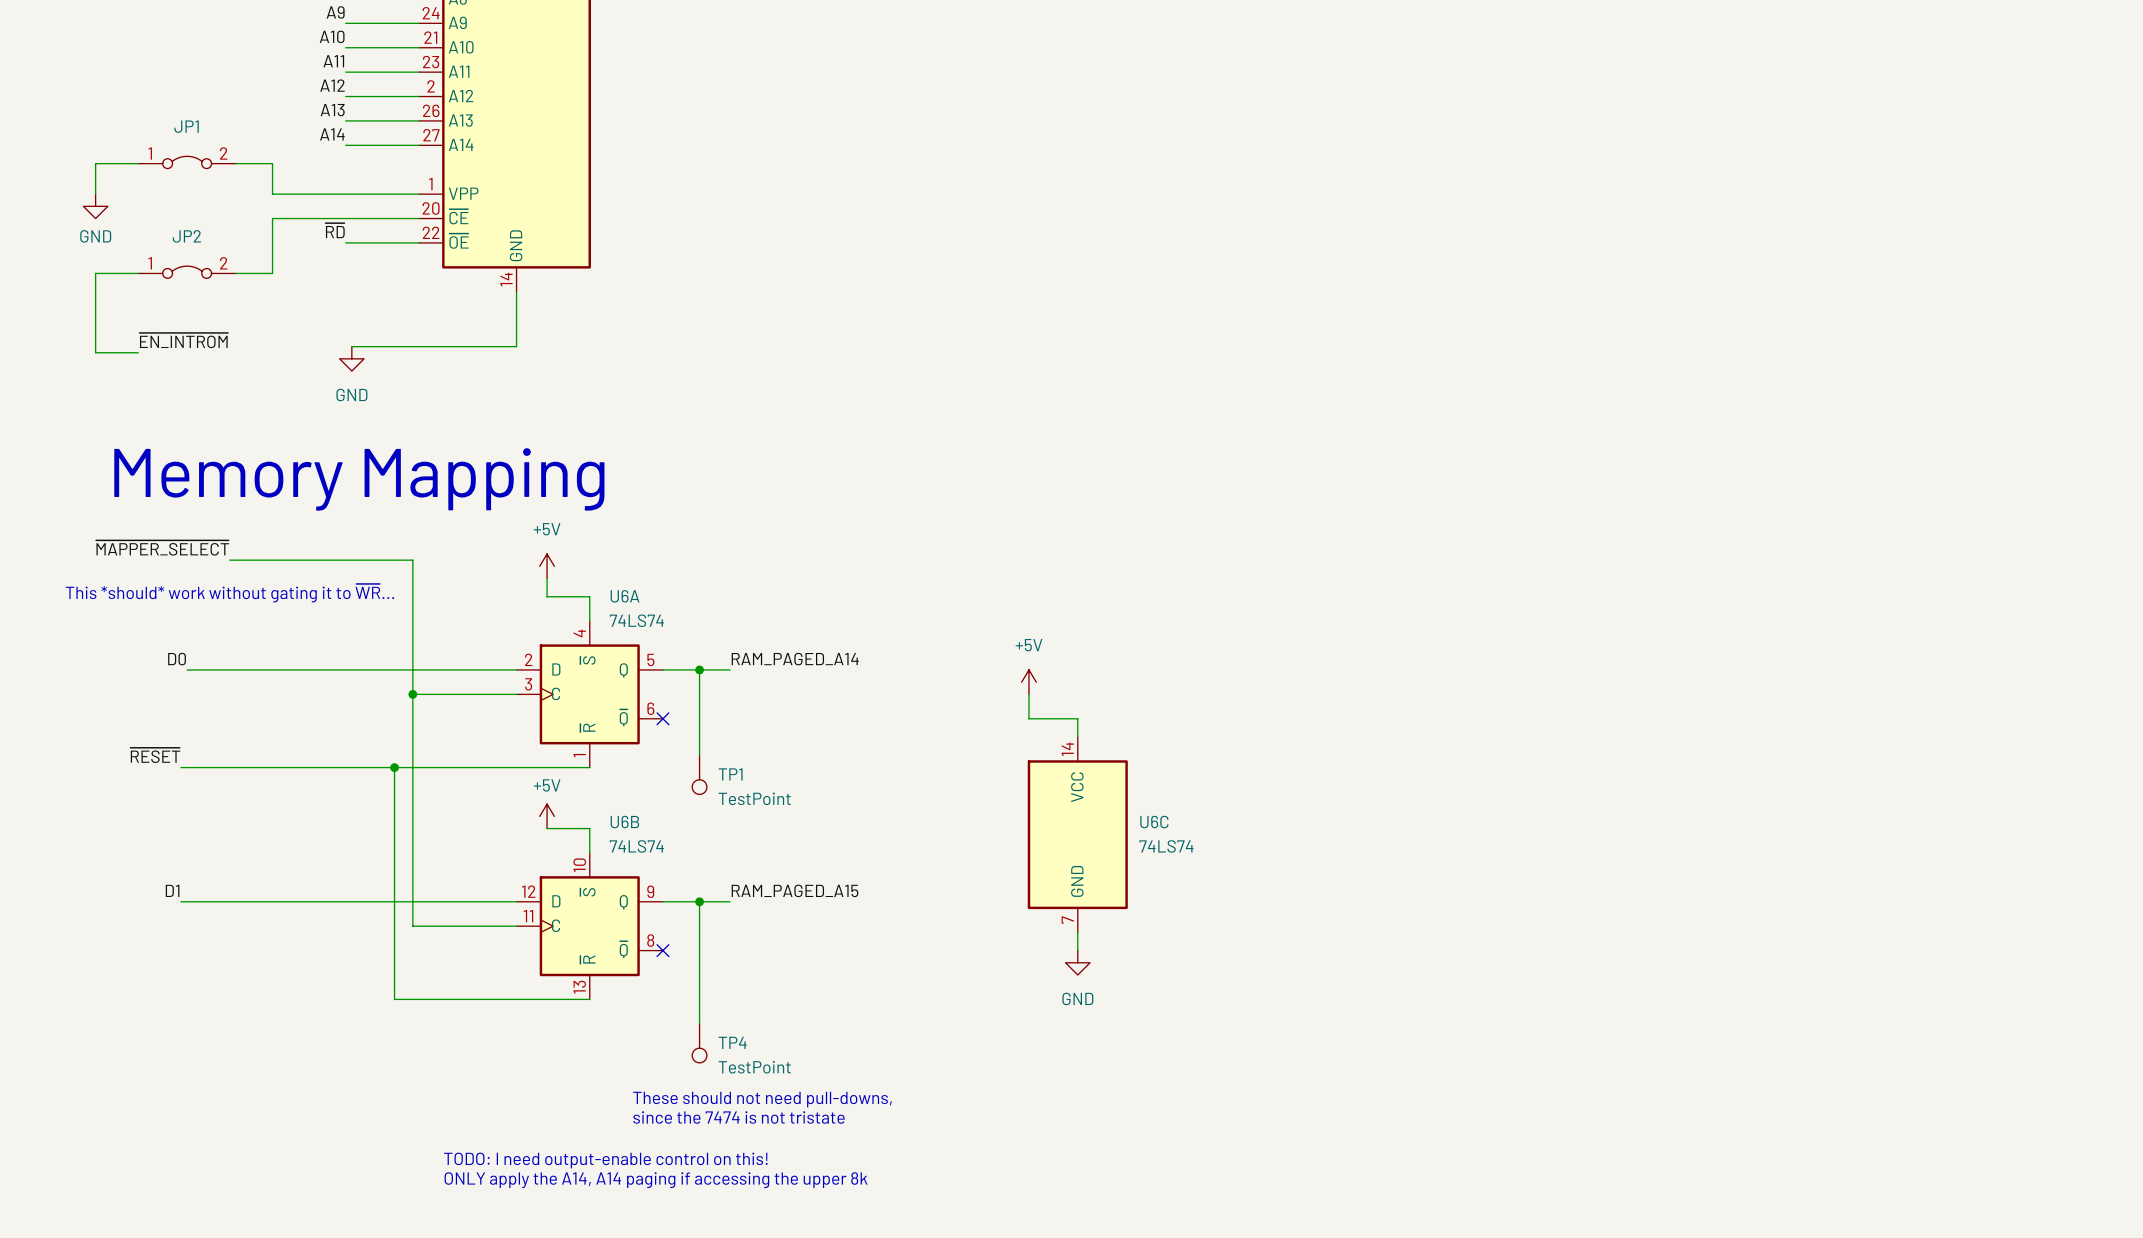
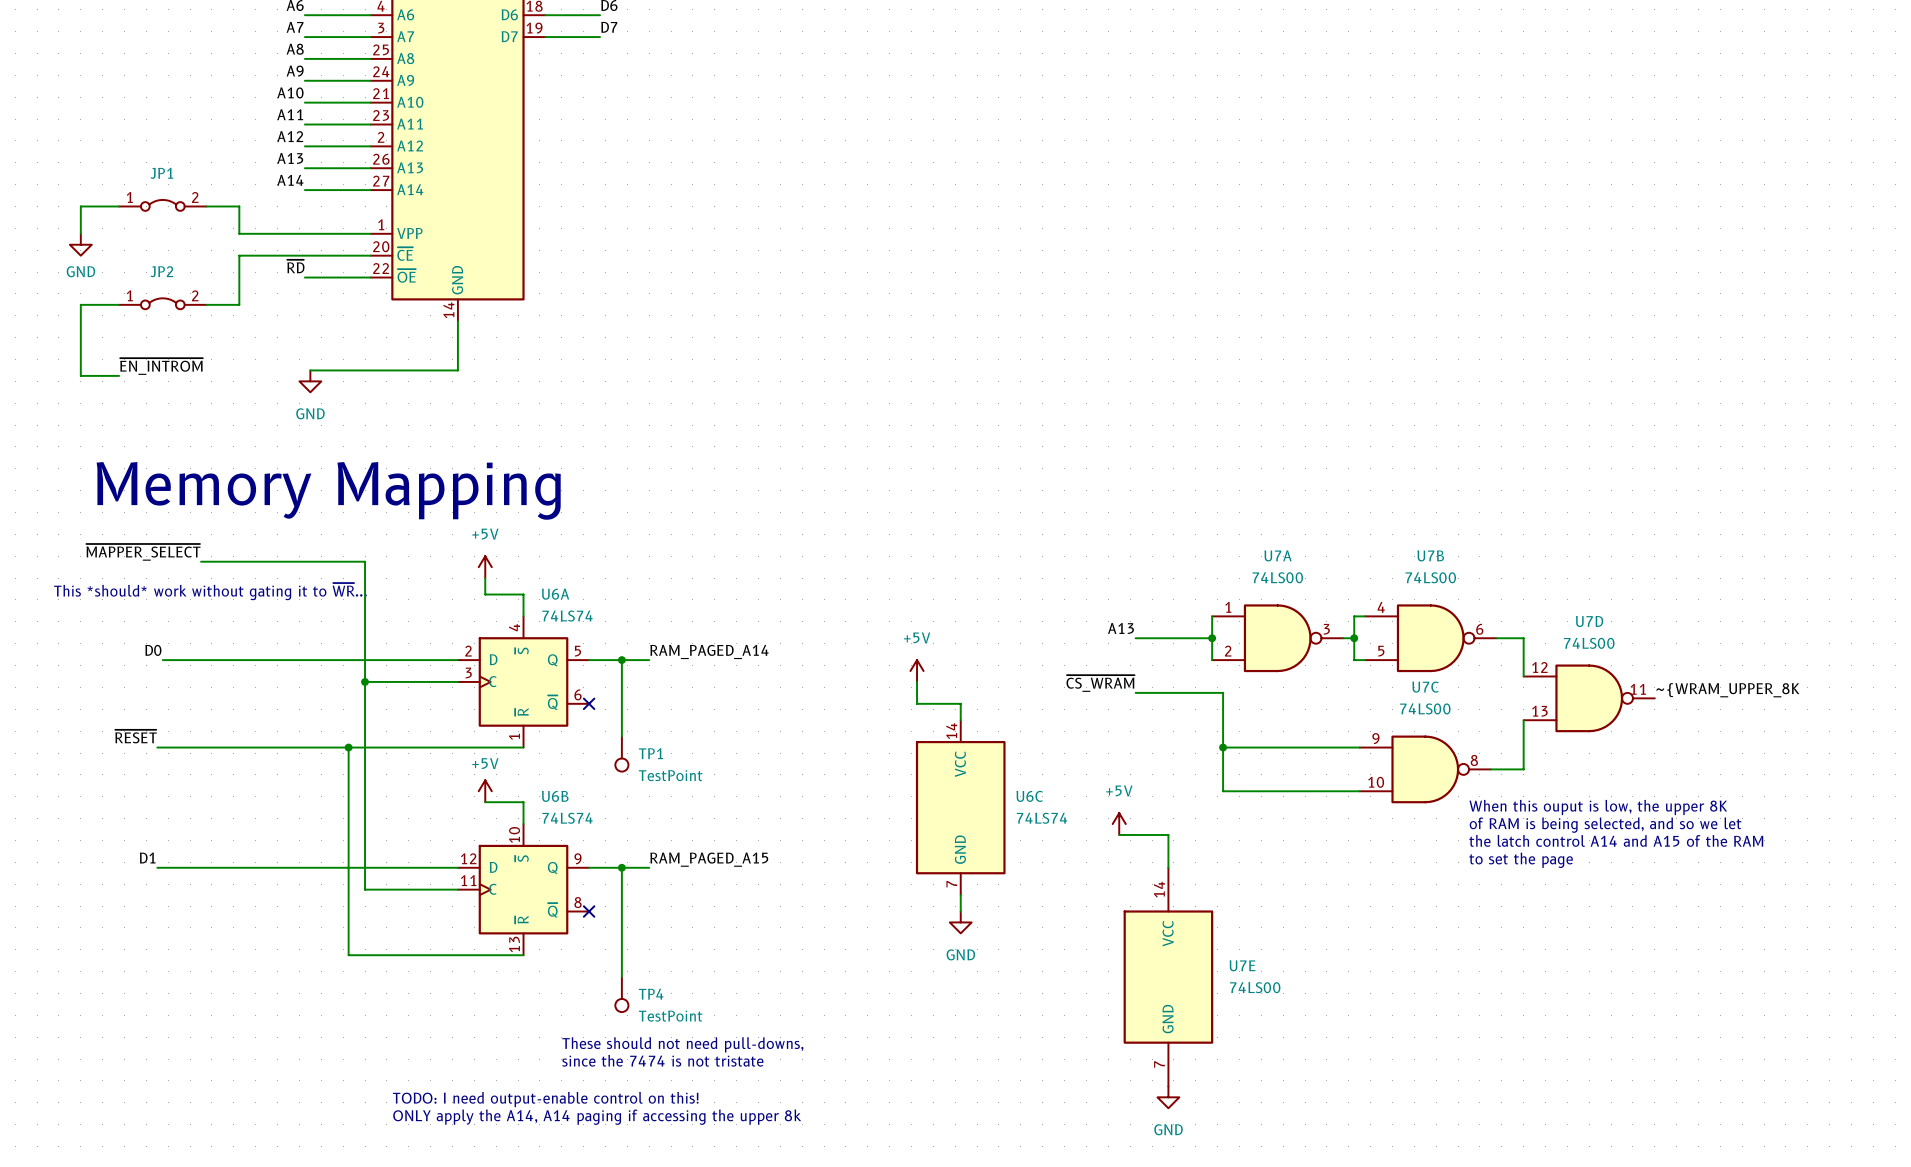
wire: none -> (1212, 616) (1212, 660)
wire: none -> (1365, 616) (1354, 616) (1354, 660) (1365, 660)
label: none -> A13 (1120, 628)
wire: none -> (1135, 638) (1212, 638)
junction: none -> (1212, 638)
U7A: none -> 74LS00 (1277, 638)
wire: none -> (1343, 638) (1354, 638)
junction: none -> (1354, 638)
U7B: none -> 74LS00 (1430, 638)
wire: none -> (1496, 638) (1523, 638) (1523, 676)
label: none -> ~{CS_WRAM} (1100, 683)
label: none -> ~{WRAM_UPPER_8K (1727, 690)
wire: none -> (1135, 692) (1223, 692) (1223, 791) (1359, 791)
U7D: none -> 74LS00 (1589, 698)
wire: none -> (1523, 720) (1523, 769) (1490, 769)
wire: none -> (1223, 747) (1359, 747)
junction: none -> (1223, 747)
U7C: none -> 74LS00 (1425, 769)
text: none -> When this ouput is low, the upper 8K (1598, 807)
power symbol: none -> +5V (1119, 824)
text: none -> of RAM is being selected, and so we let (1605, 825)
wire: none -> (1119, 834) (1168, 834) (1168, 867)
text: none -> the latch control A14 and A15 of the RAM (1616, 840)
text: none -> to set the page (1521, 860)
U7E: none -> 74LS00 (1168, 977)
power symbol: none -> GND (1168, 1097)

